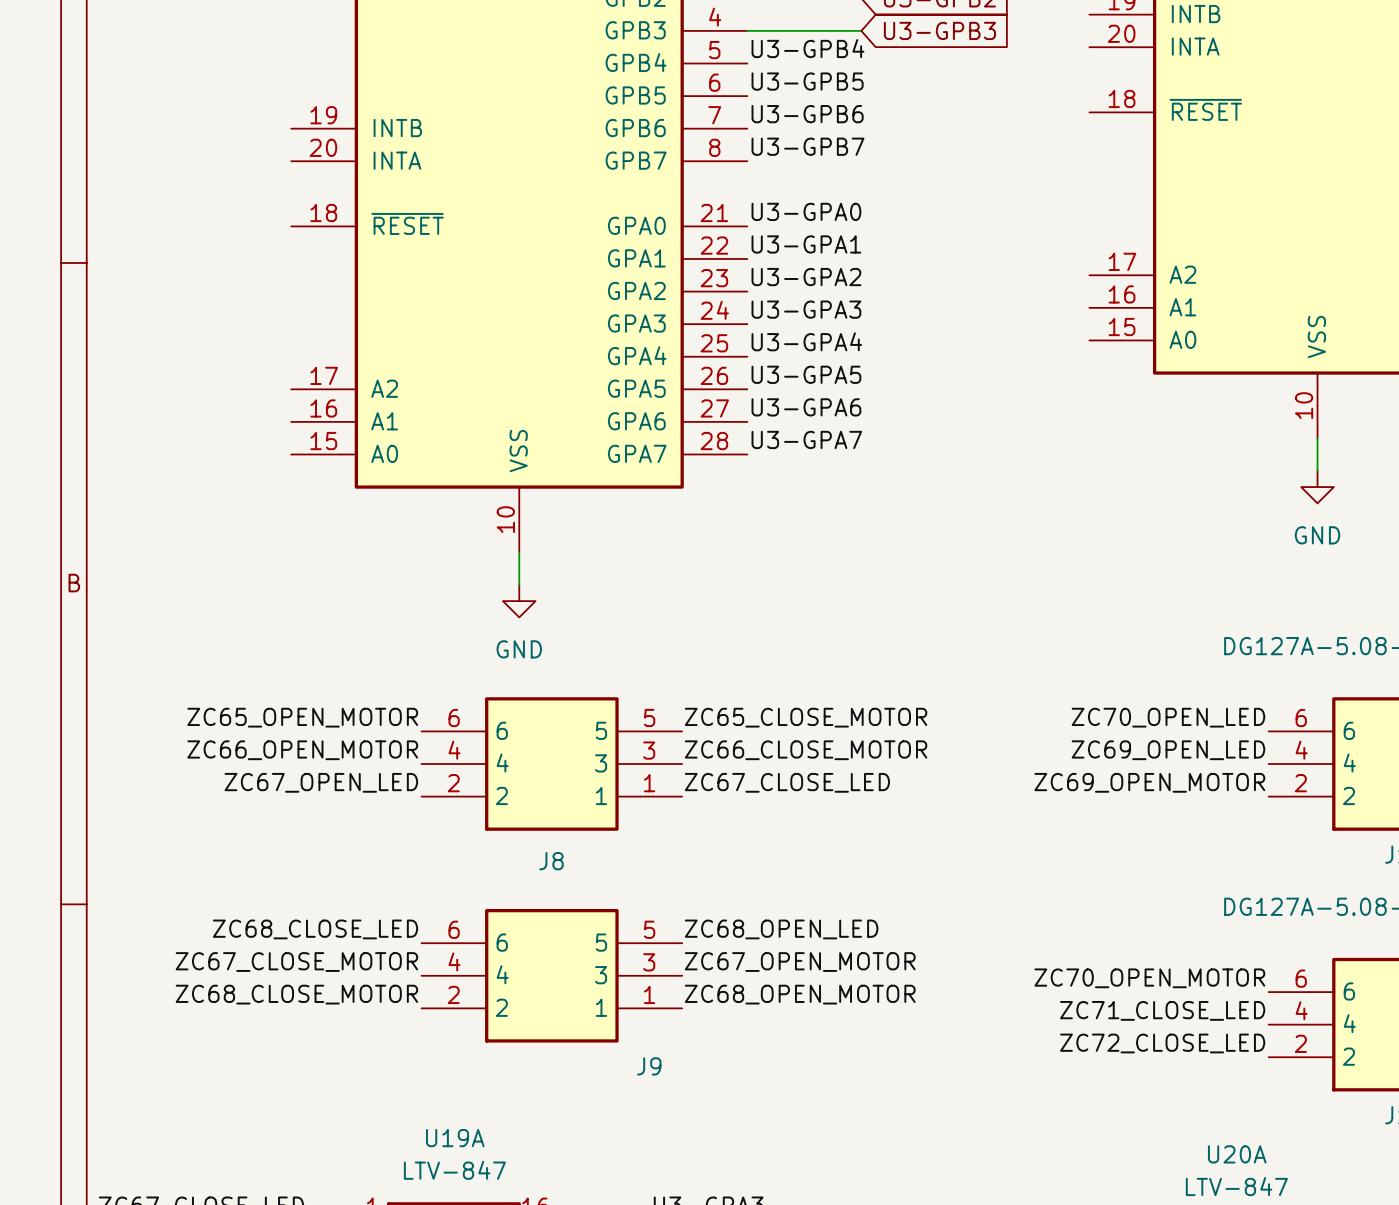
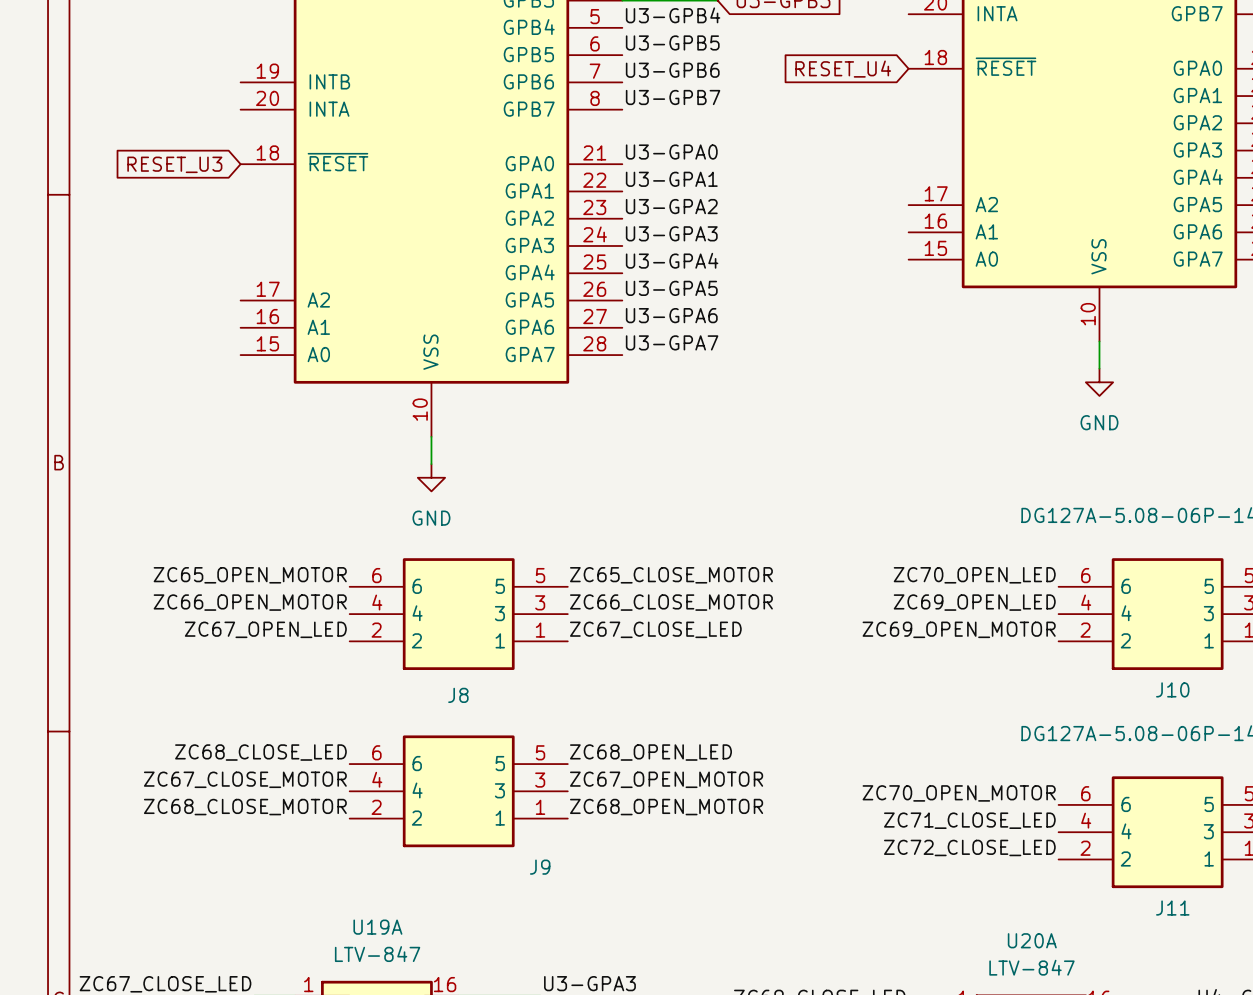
global label: none -> RESET_U4 (843, 69)
global label: none -> RESET_U3 (174, 164)

